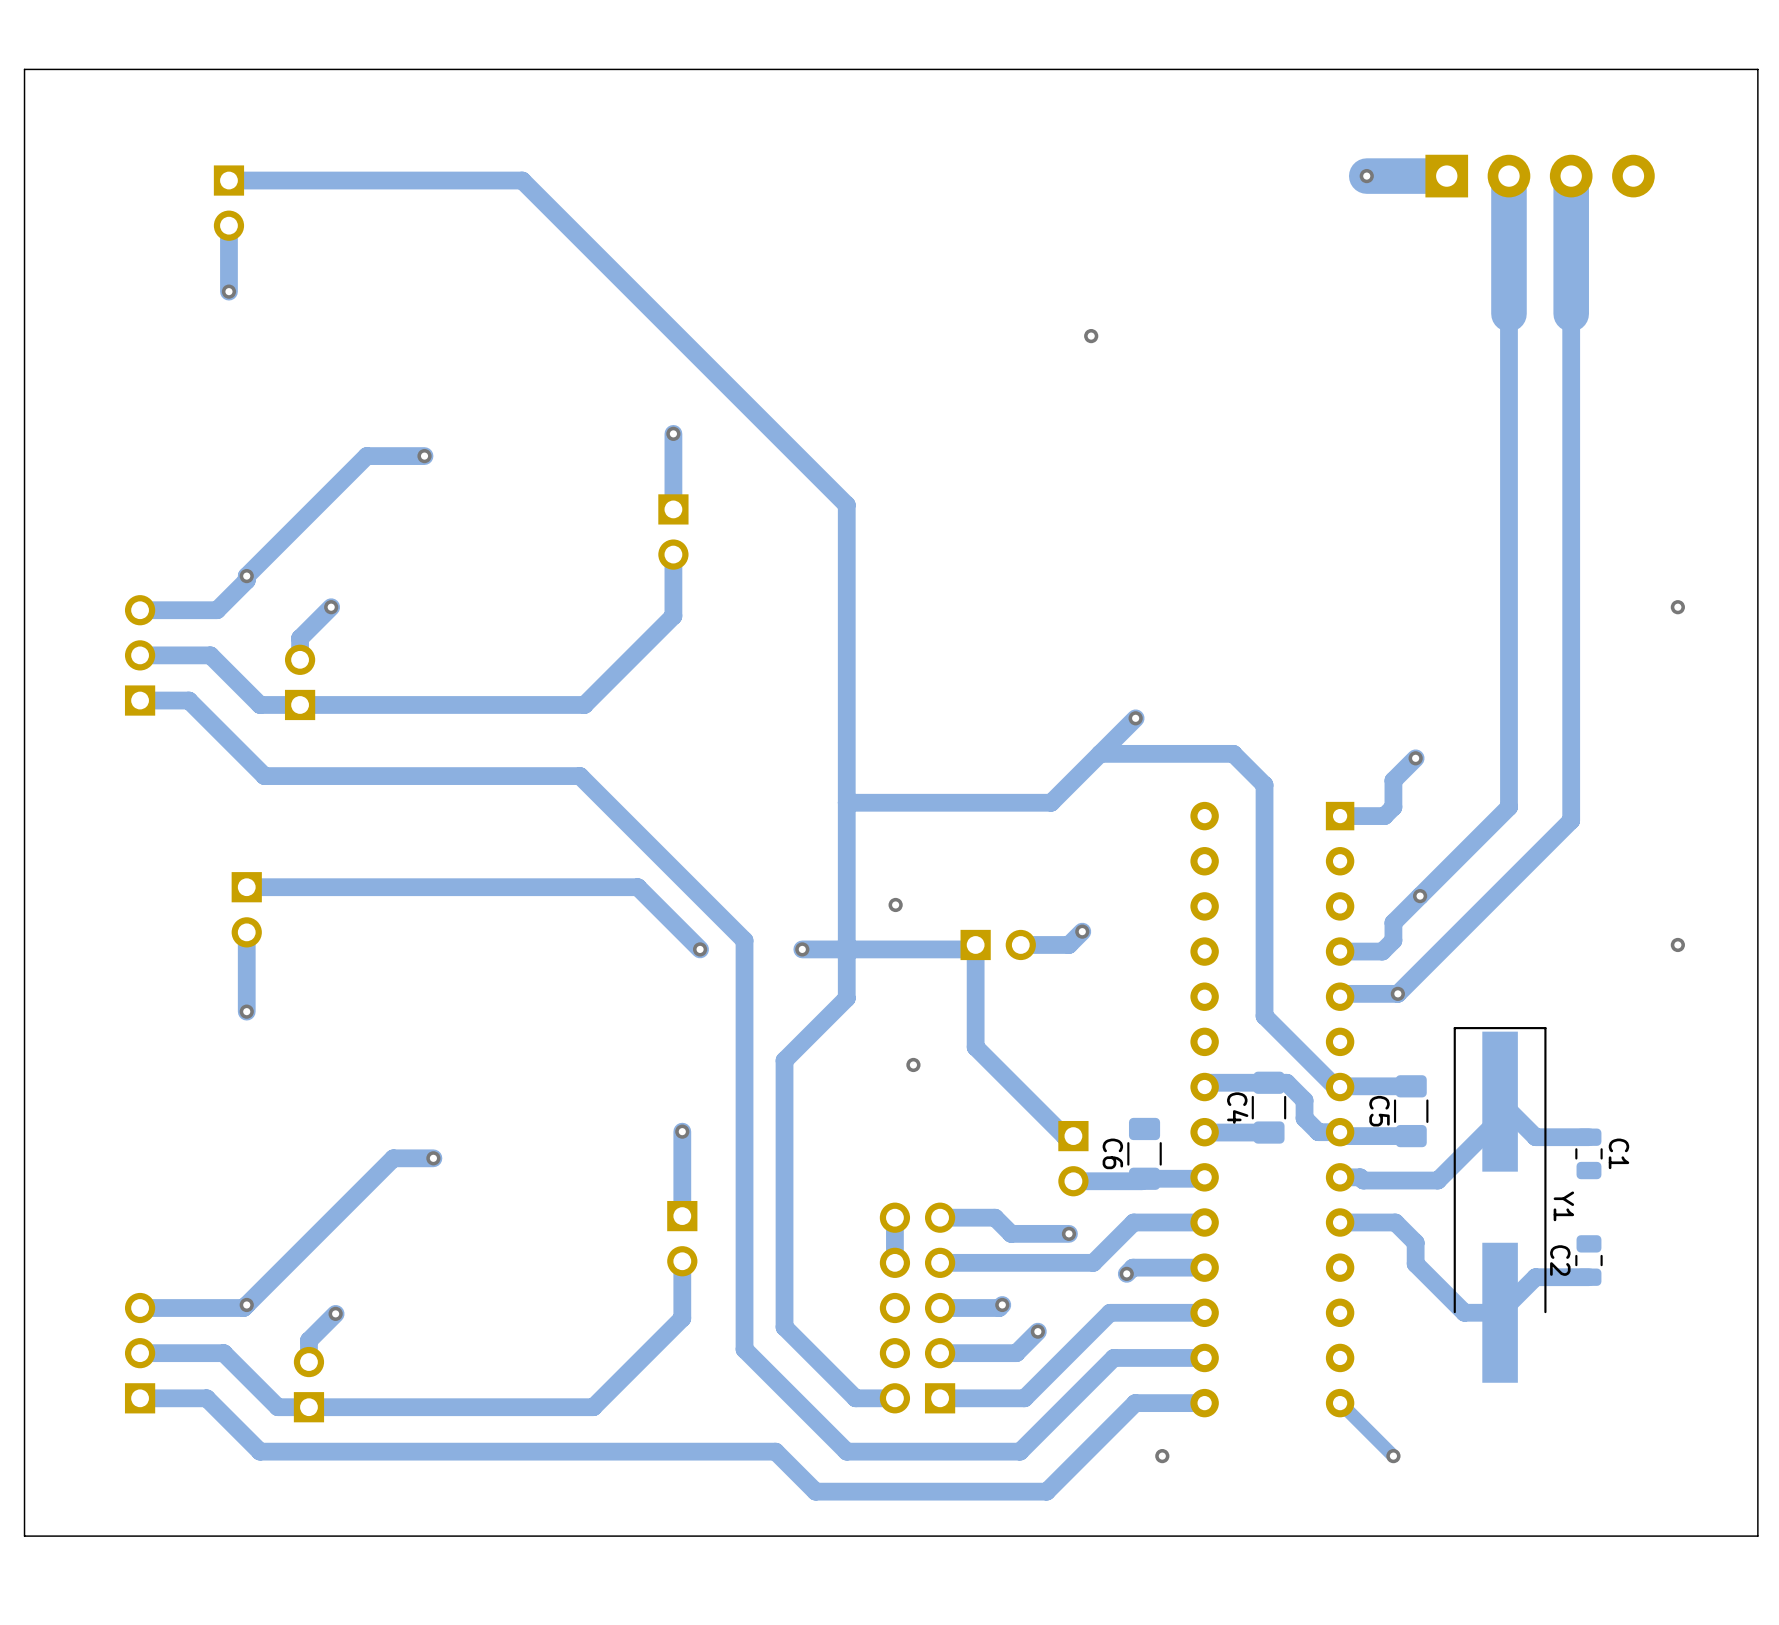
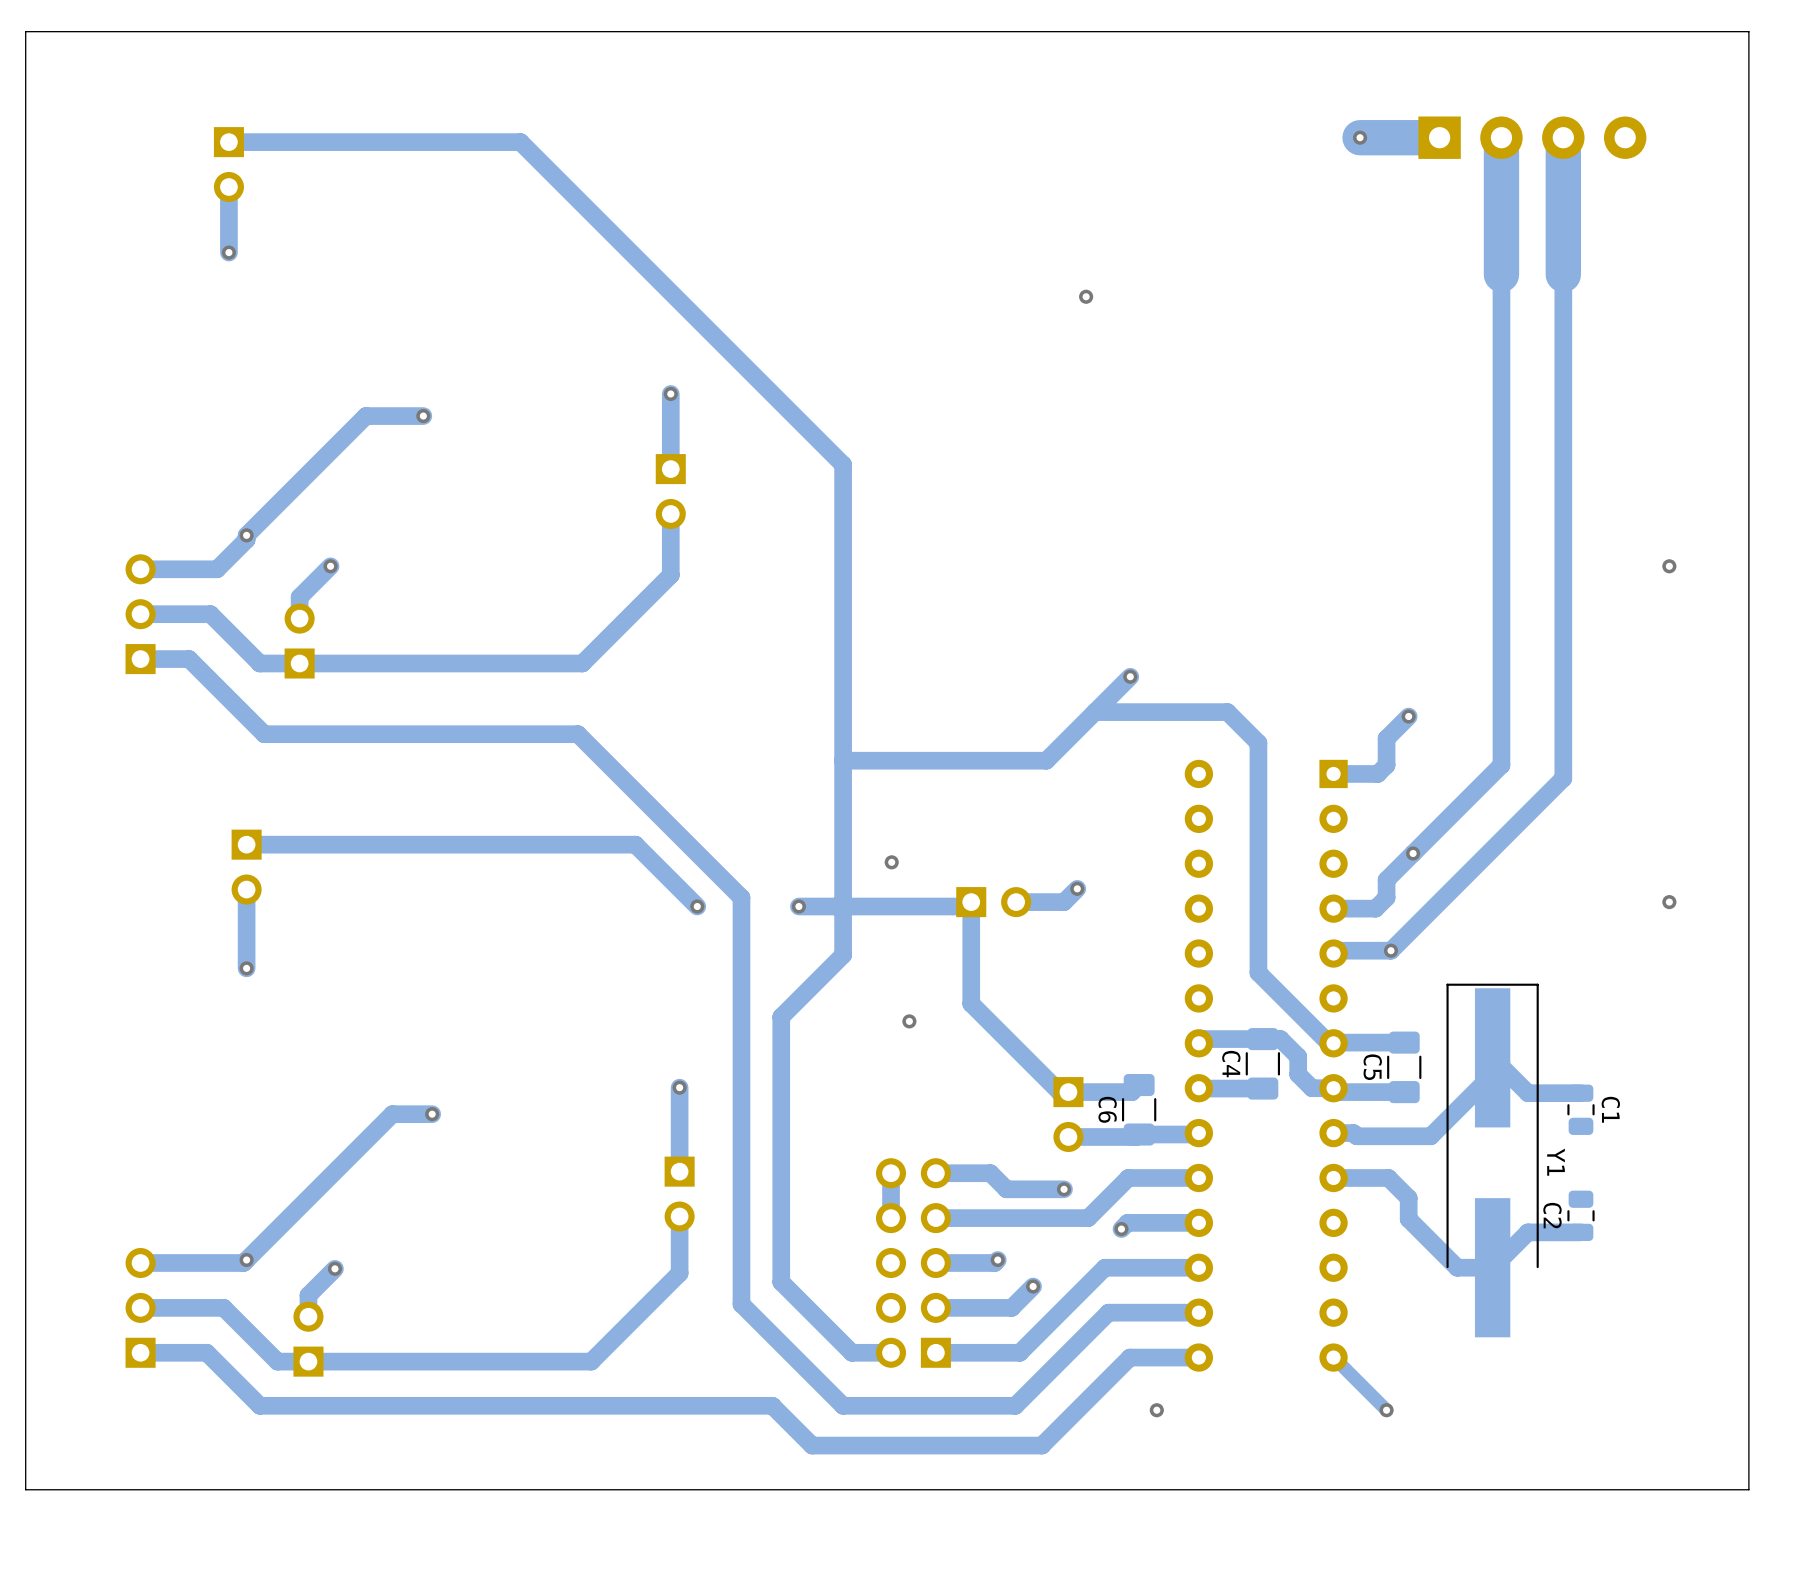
track: none -> (1139, 1085) (1132, 1092) (1068, 1092)

